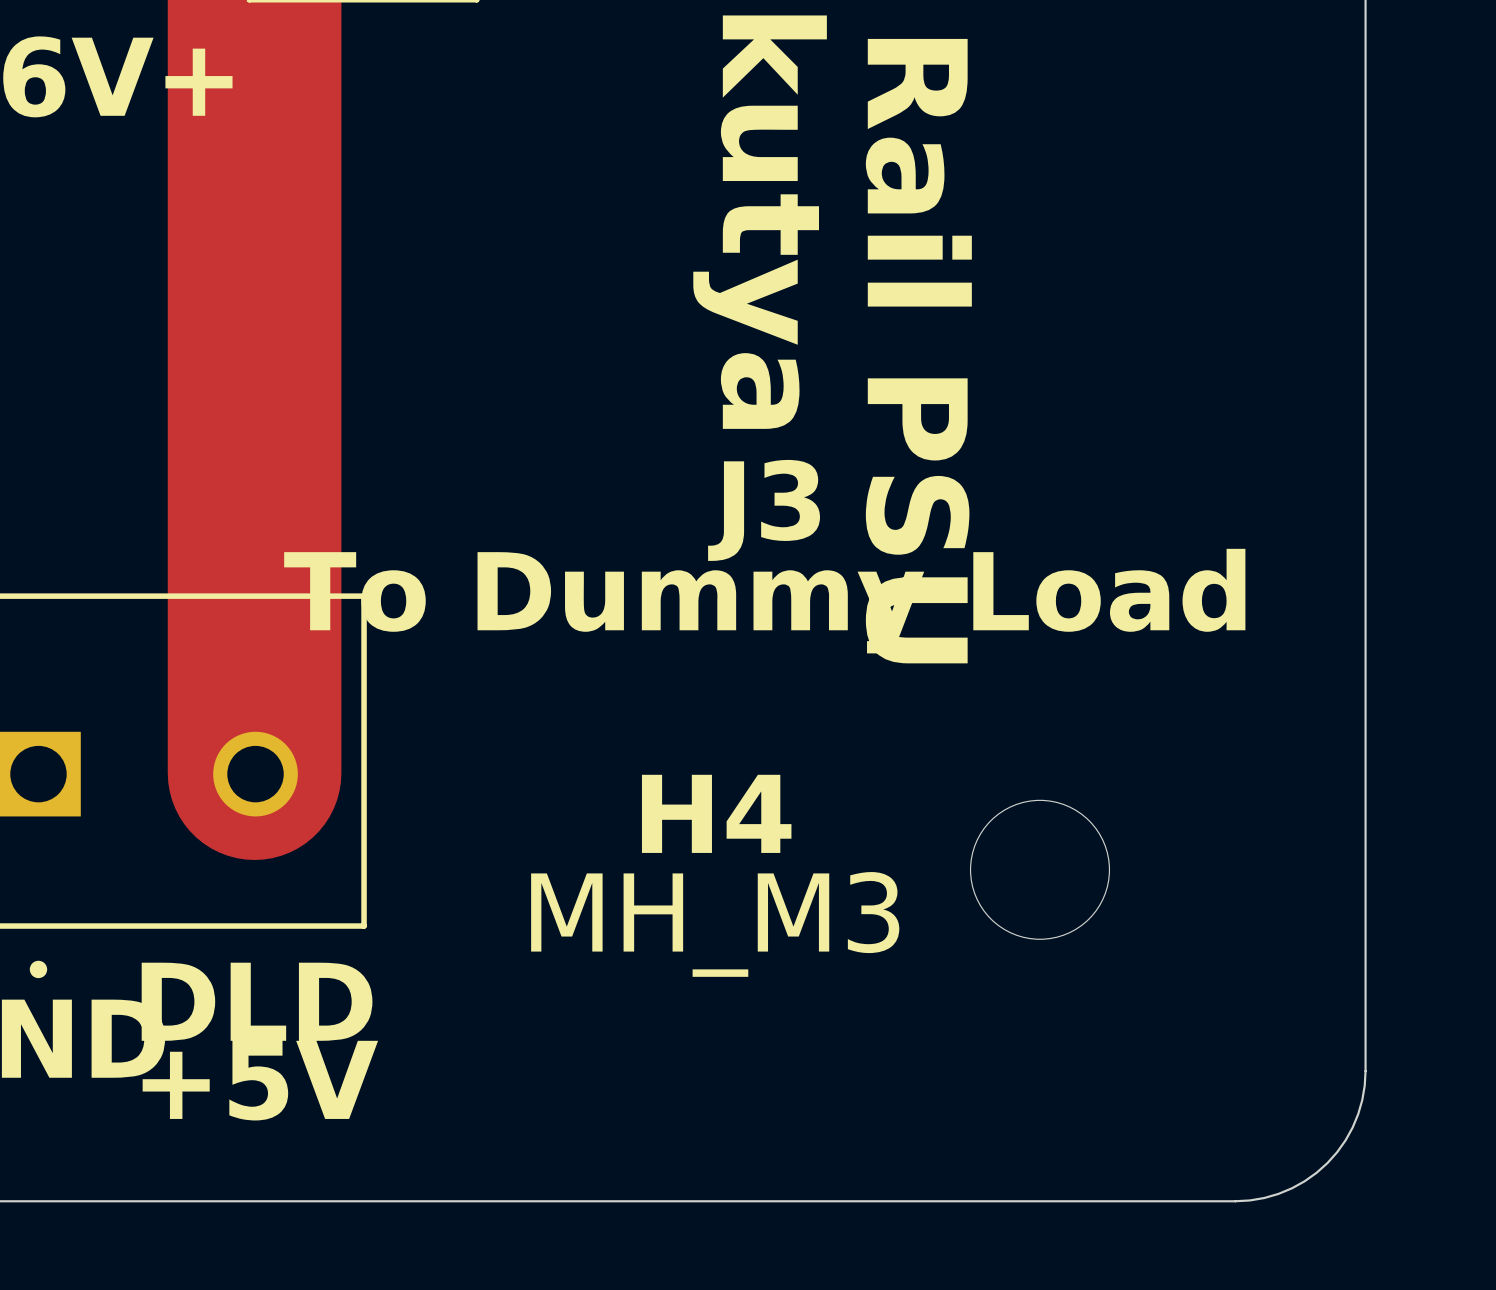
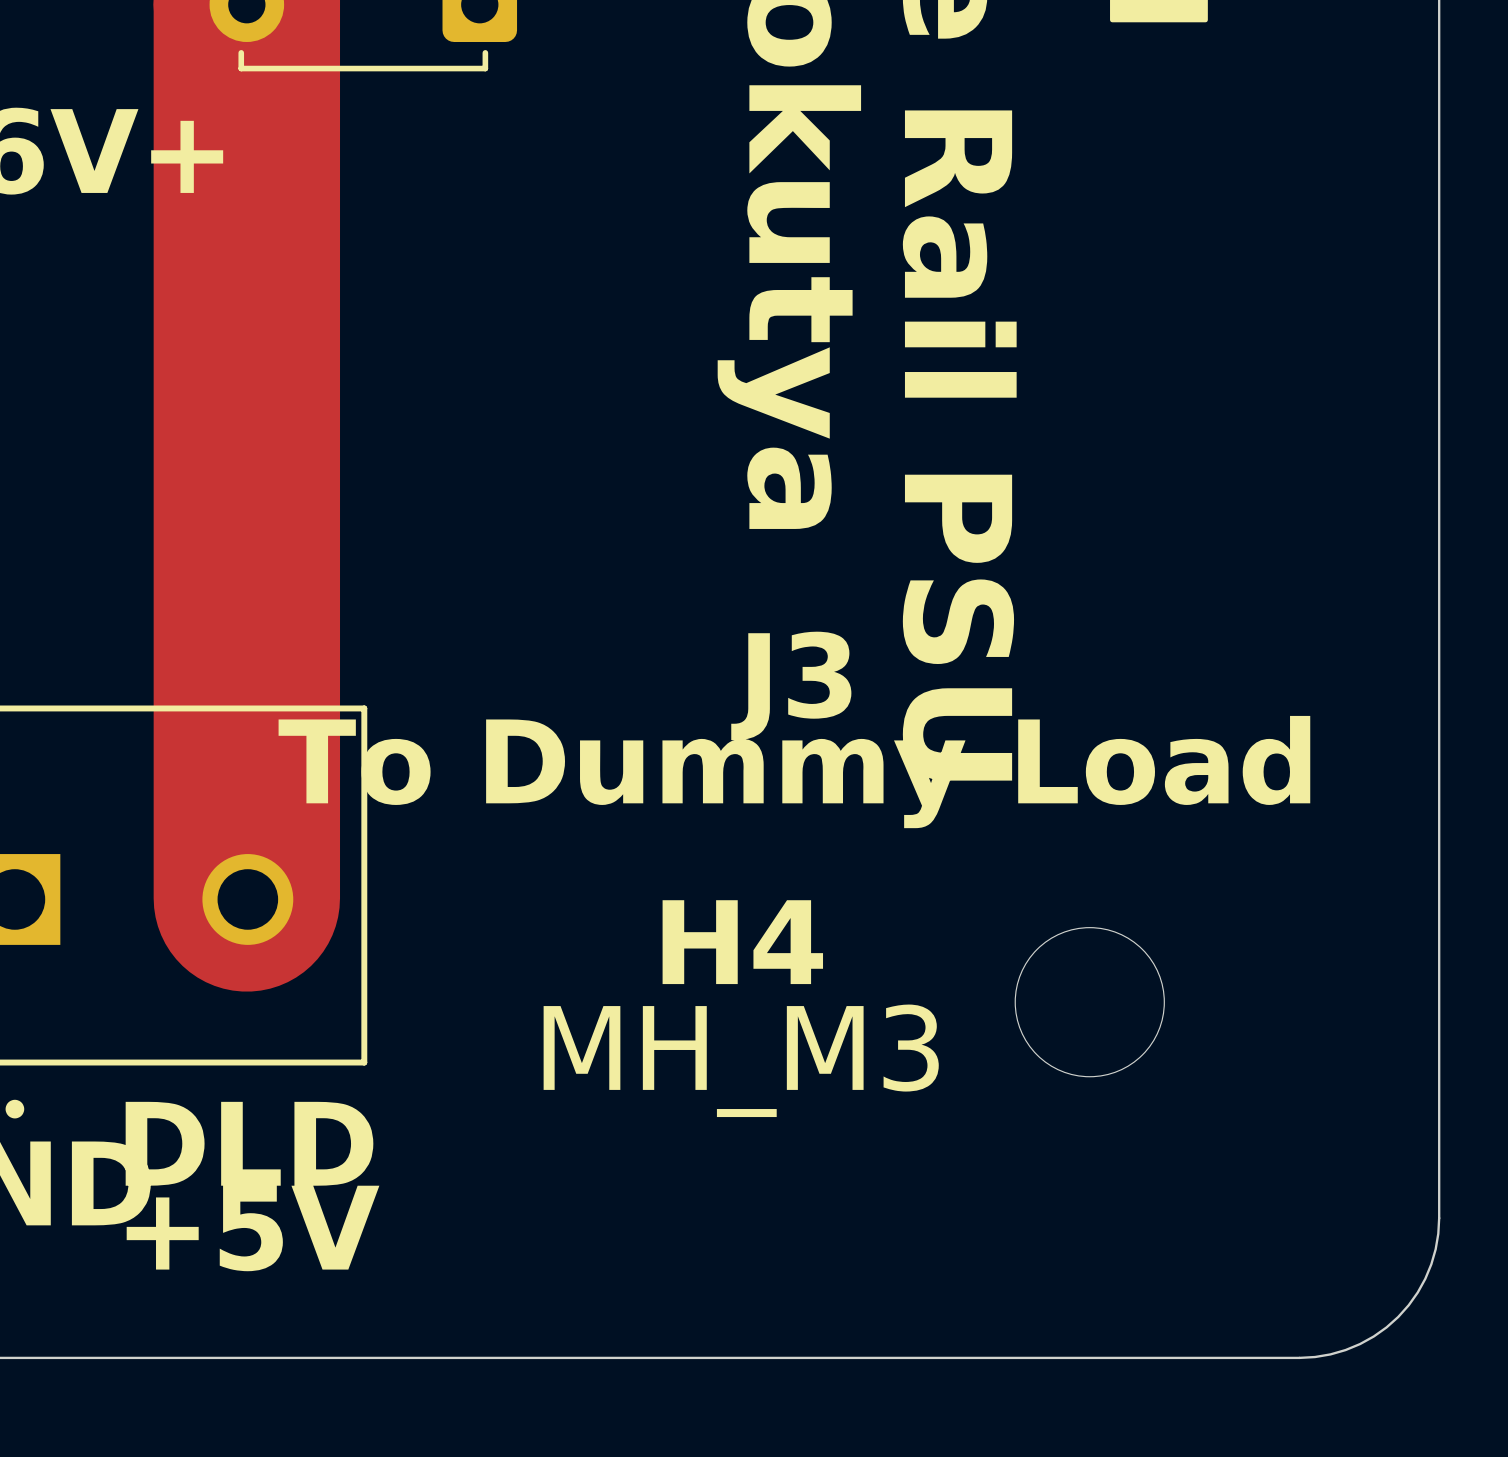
J3 name position: J3 (764, 510) -> J3 (791, 685)
J3 value position: To Dummy Load (764, 601) -> To Dummy Load (794, 772)

